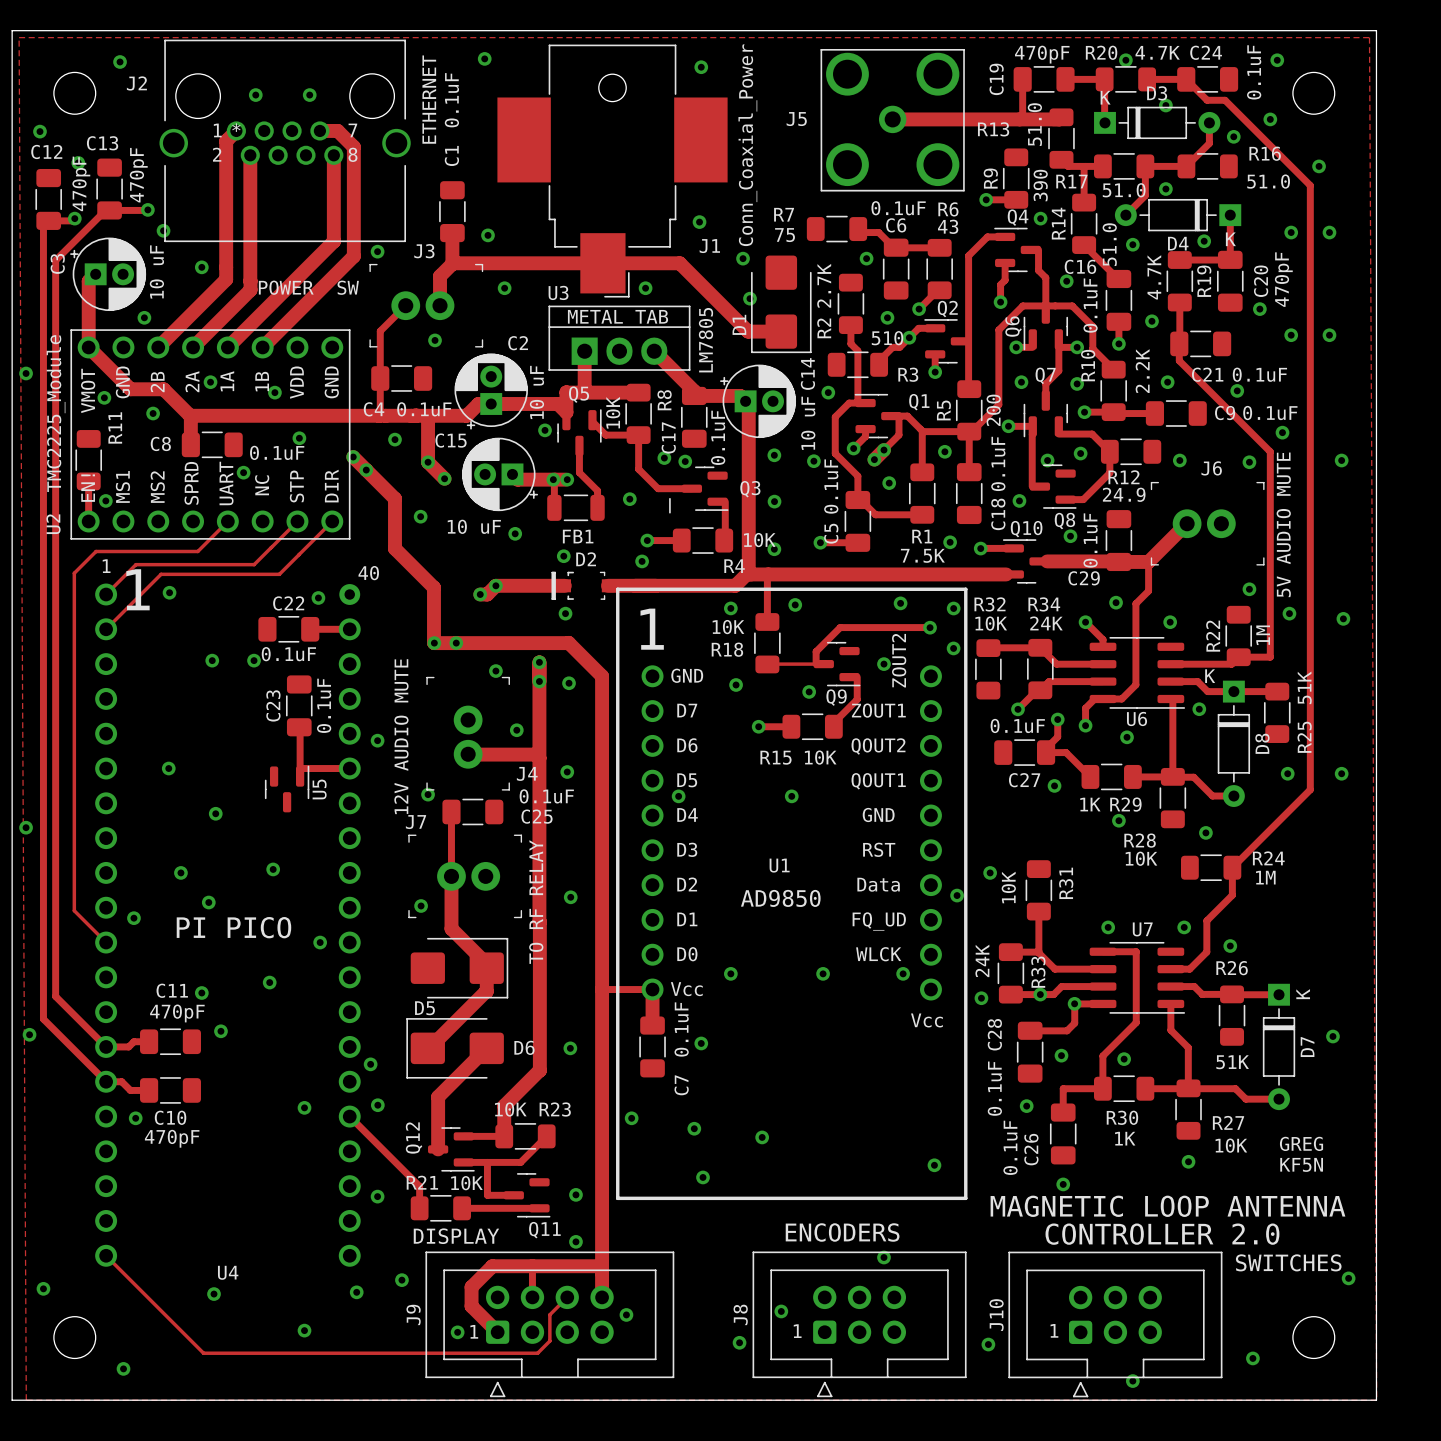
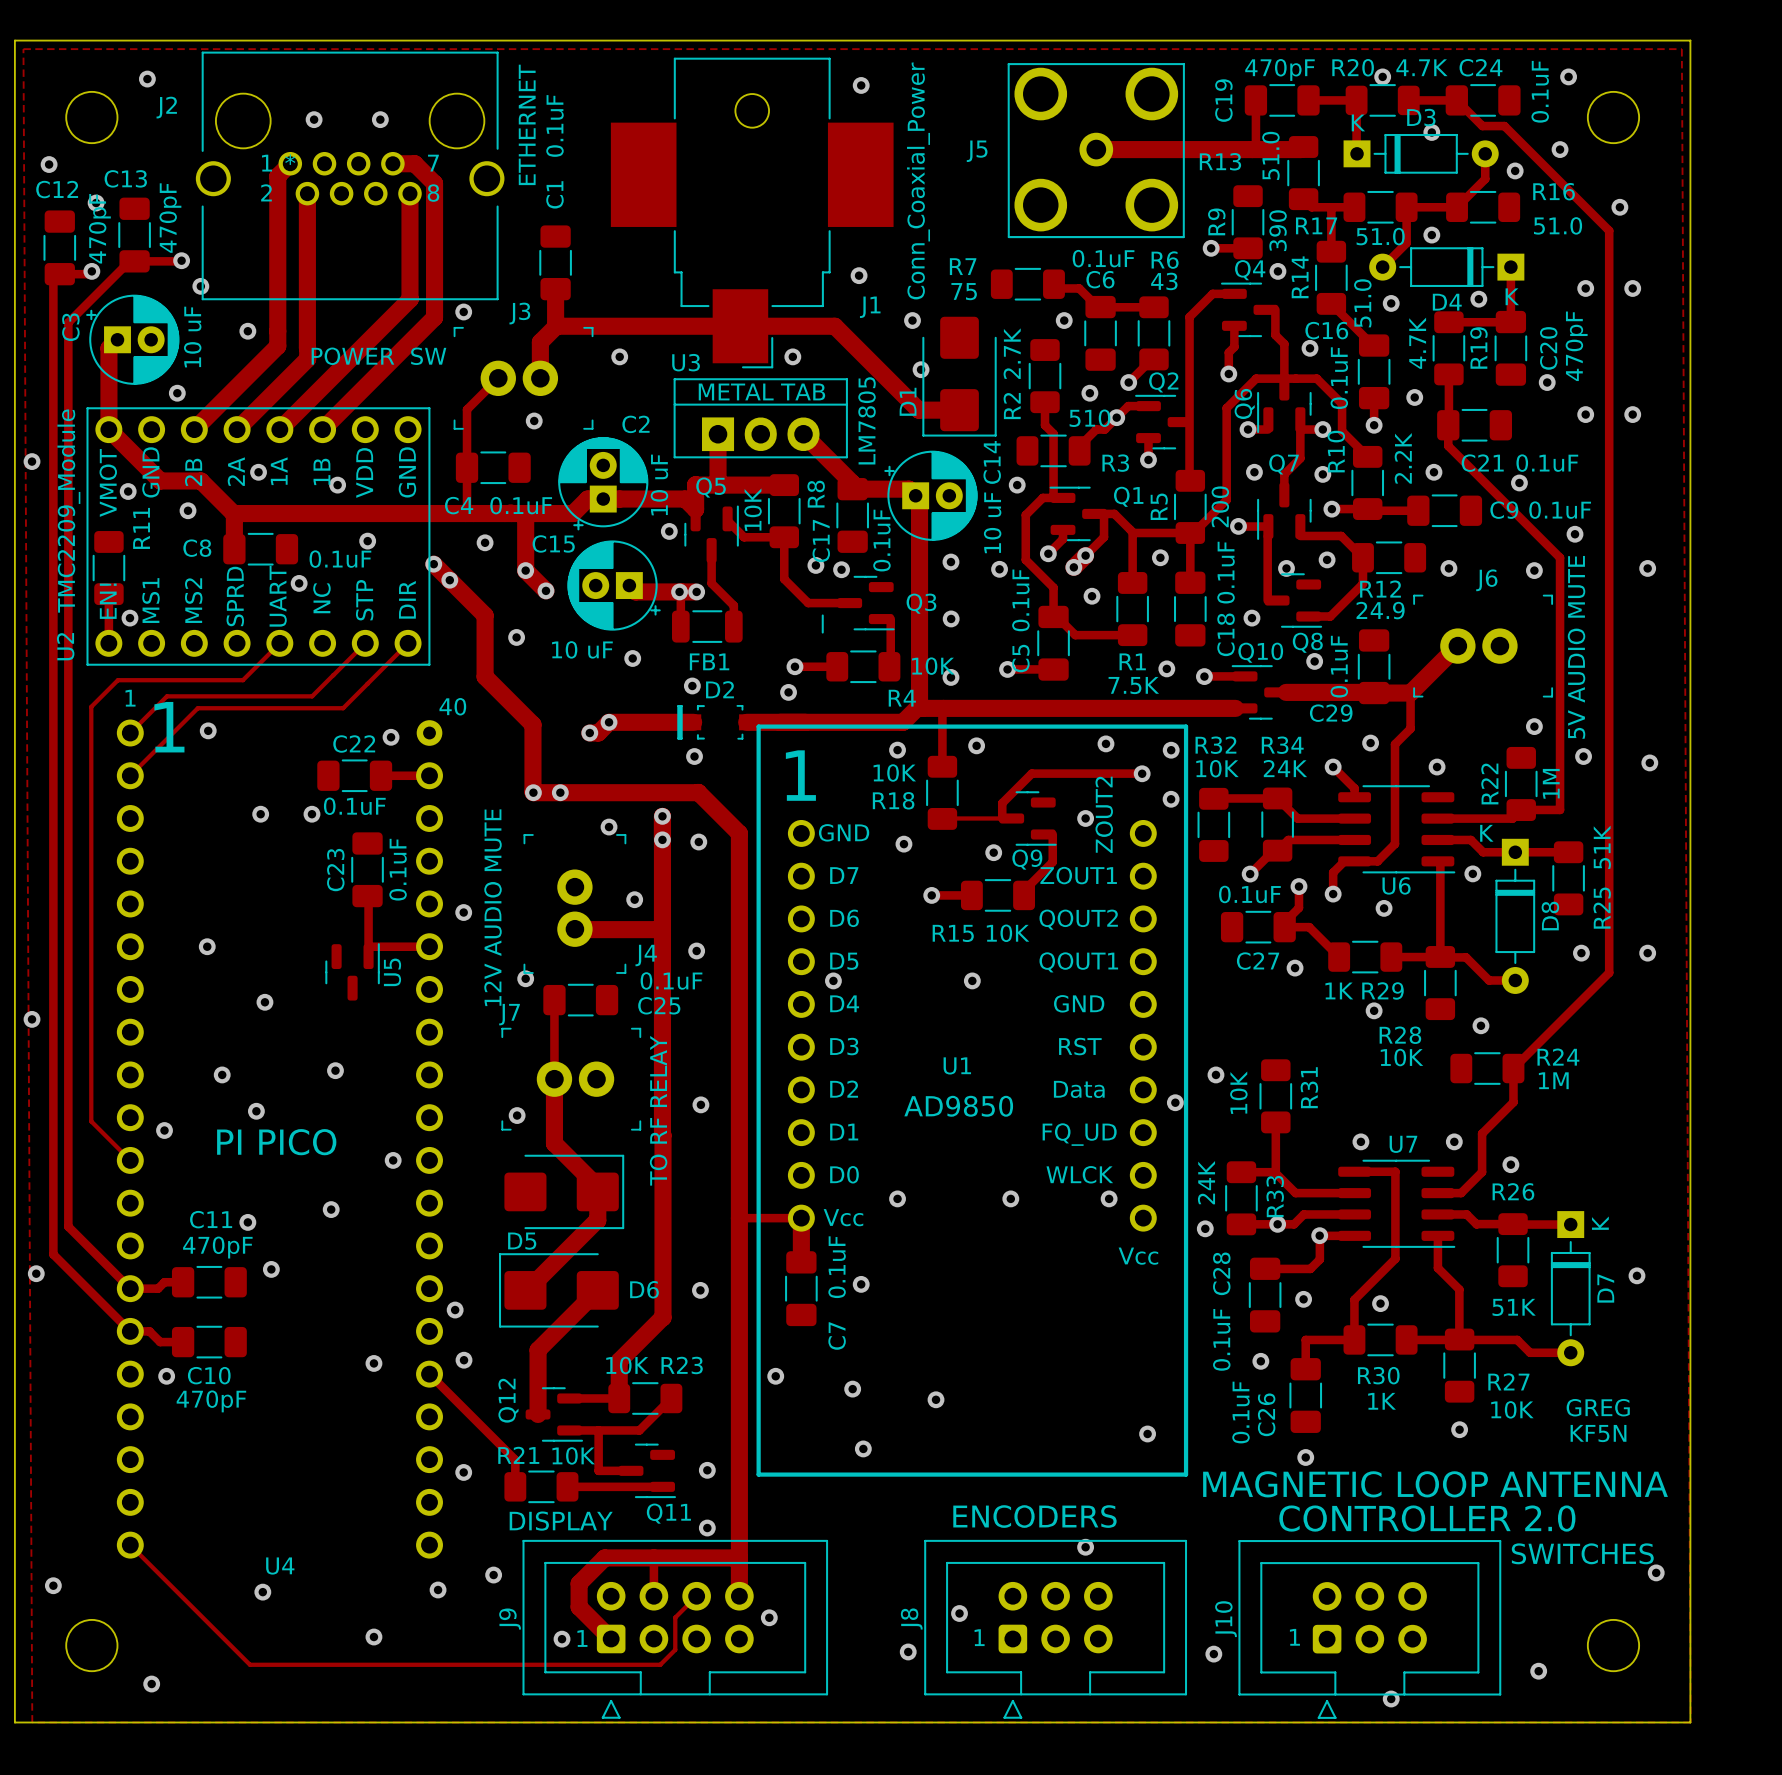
via: (484, 58) -> none
via: (488, 235) -> none
U2 value: TMC2225_Module (56, 413) -> TMC2209_Module (68, 511)
via: (629, 499) -> none

